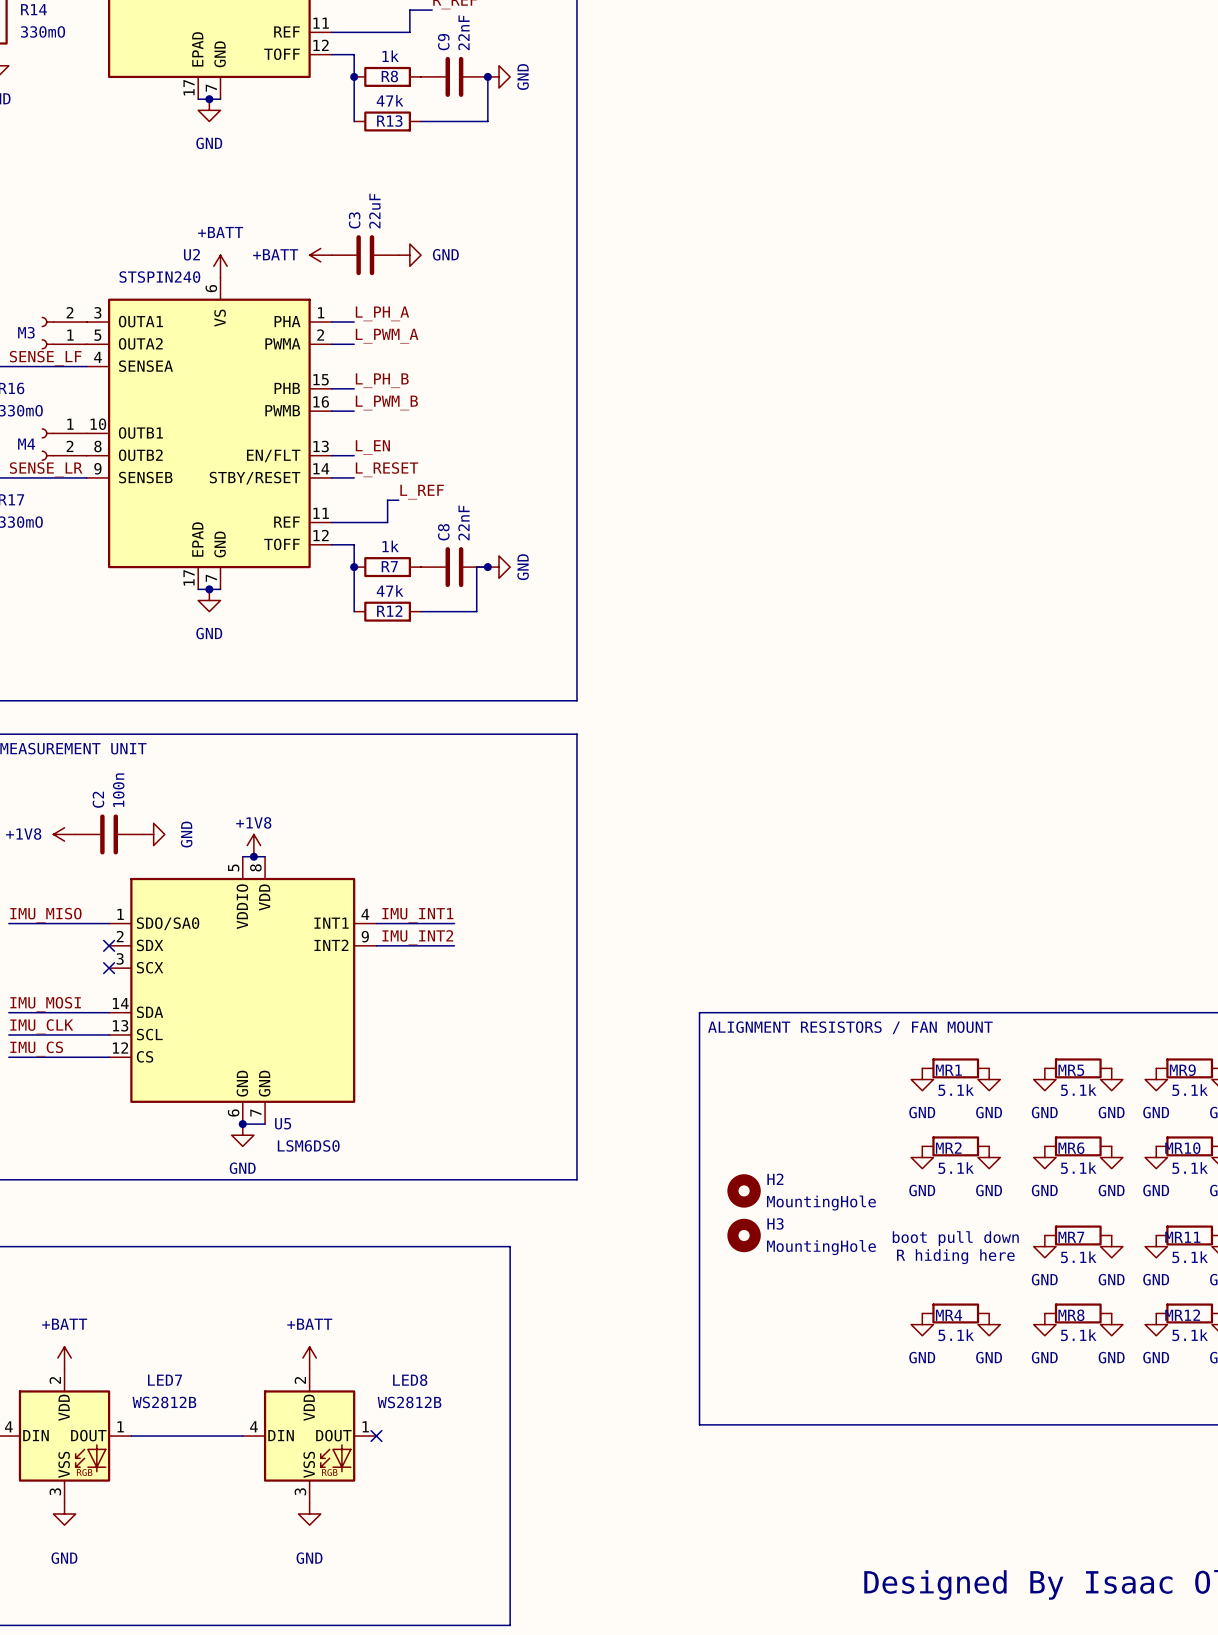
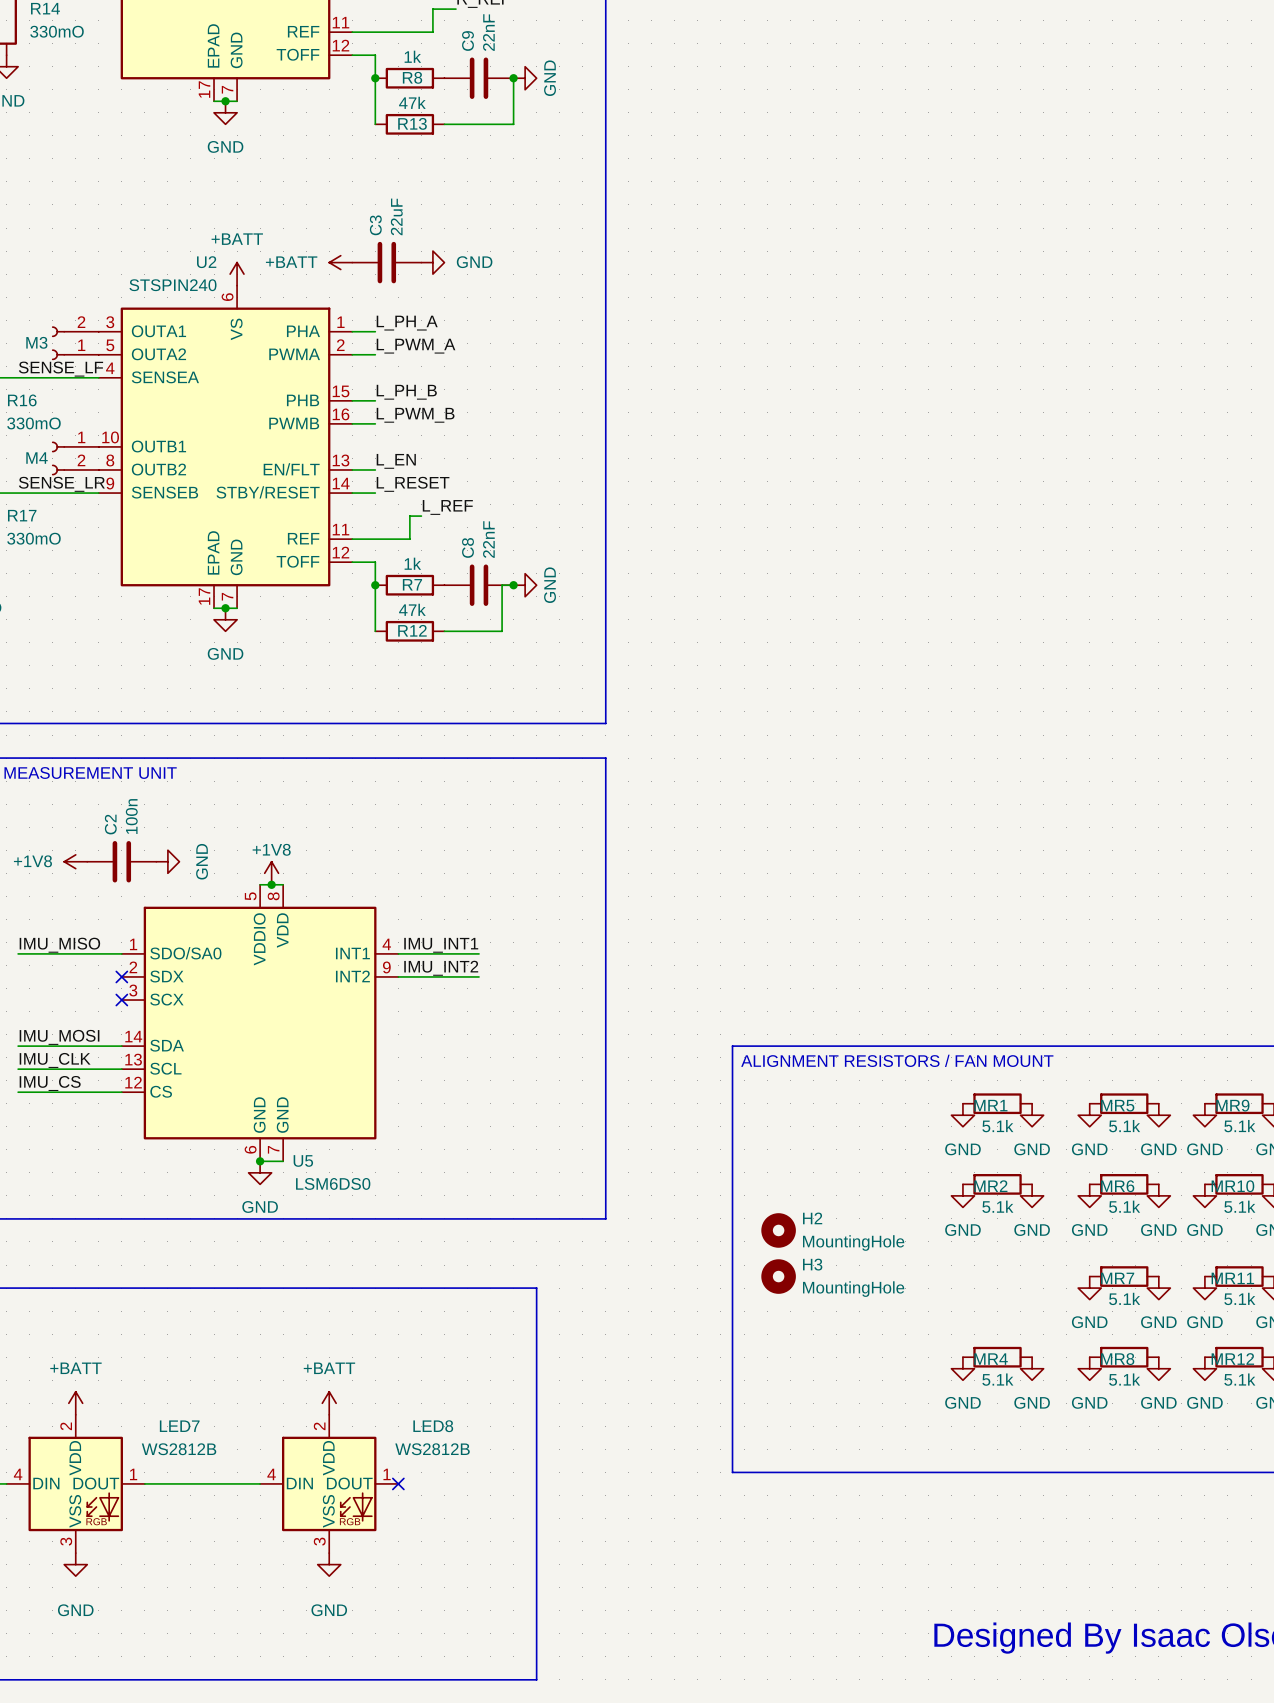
text: boot pull down (955, 1238) -> none
text: R hiding here (955, 1256) -> none

